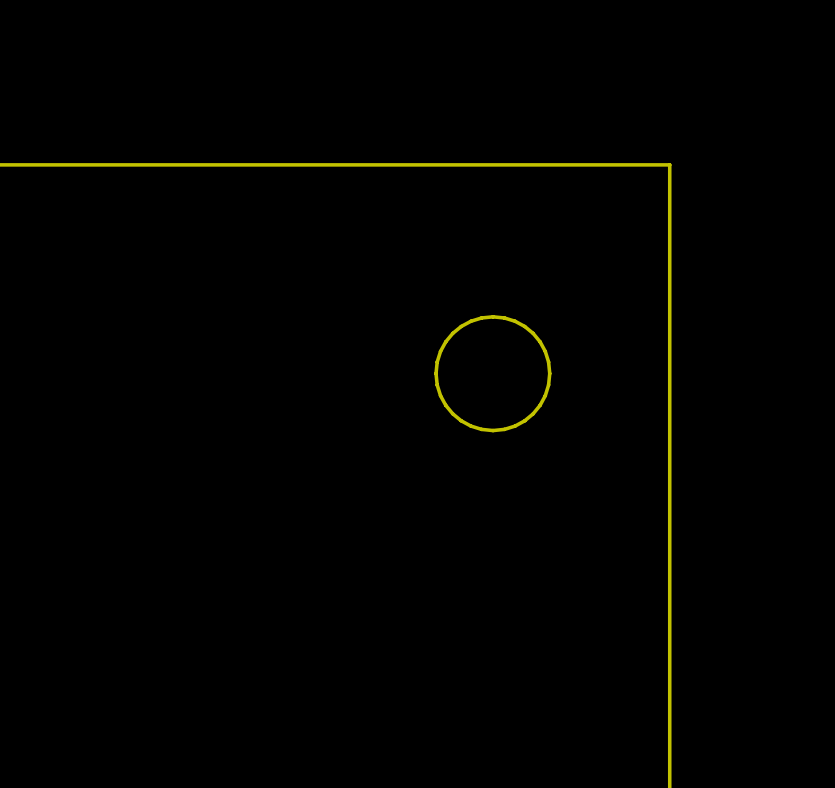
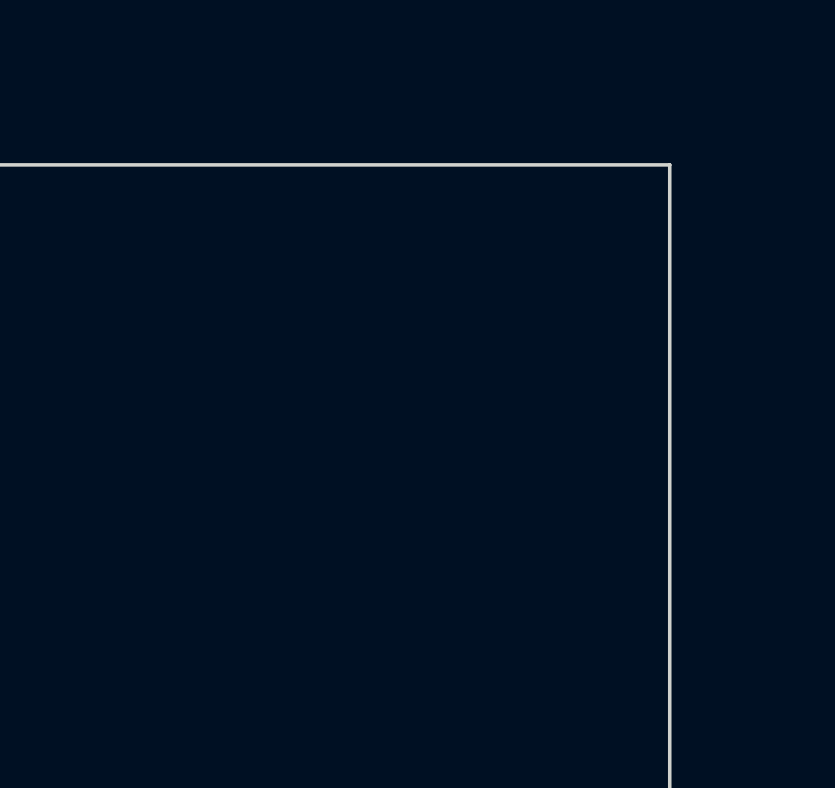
board edge: (493, 316) (515, 321) (533, 333) (545, 351) (549, 373) (545, 395) (533, 413) (515, 426) (493, 430) (470, 426) (452, 413) (440, 395) (436, 373) (440, 351) (452, 333) (470, 321) (493, 316) -> none

